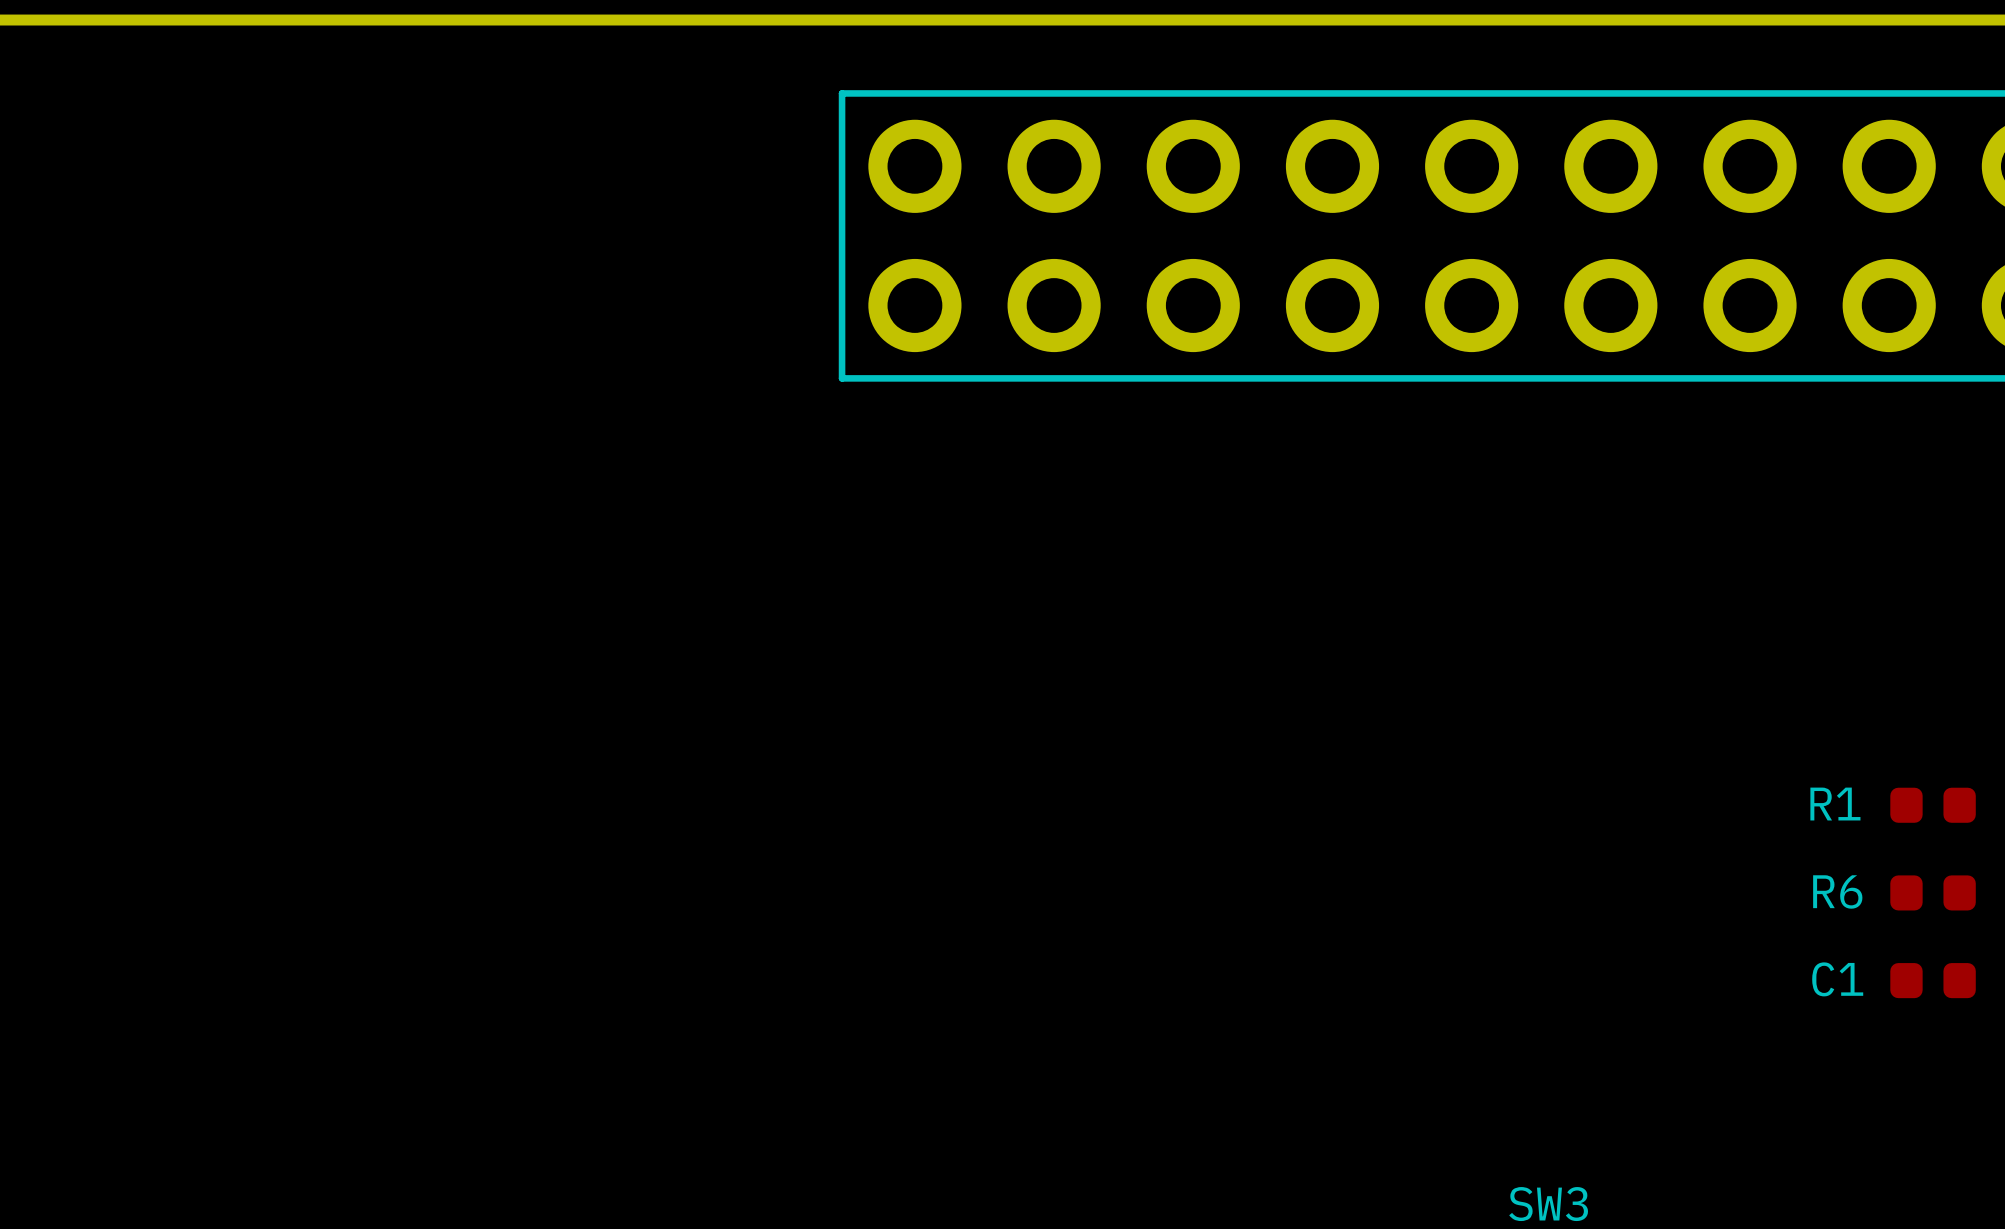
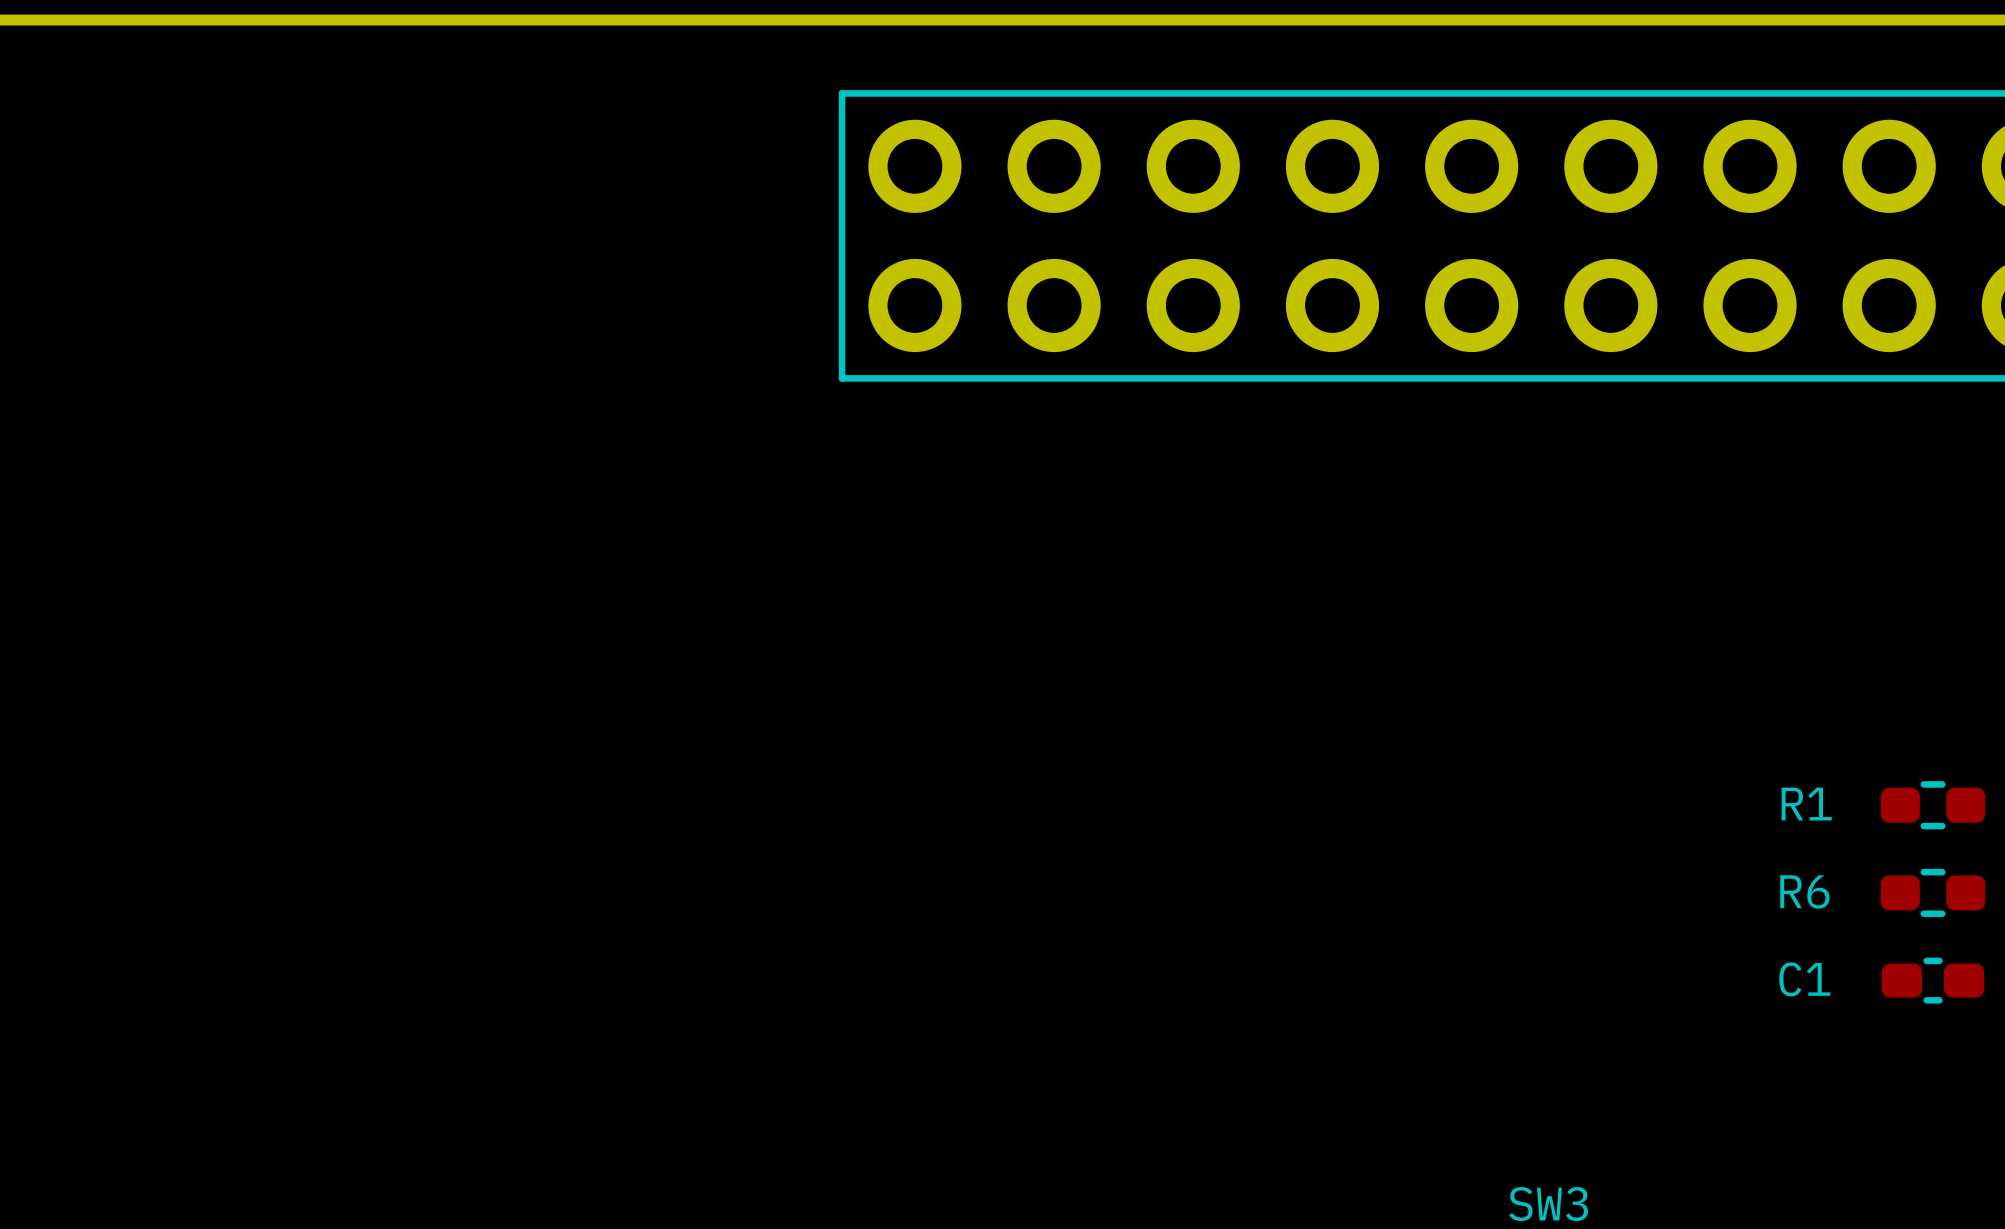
R1 footprint: [1890, 787, 1976, 823] -> [1880, 781, 1986, 830]
R6 footprint: [1890, 875, 1976, 911] -> [1880, 868, 1986, 918]
C1 footprint: [1890, 963, 1976, 999] -> [1881, 957, 1985, 1004]

